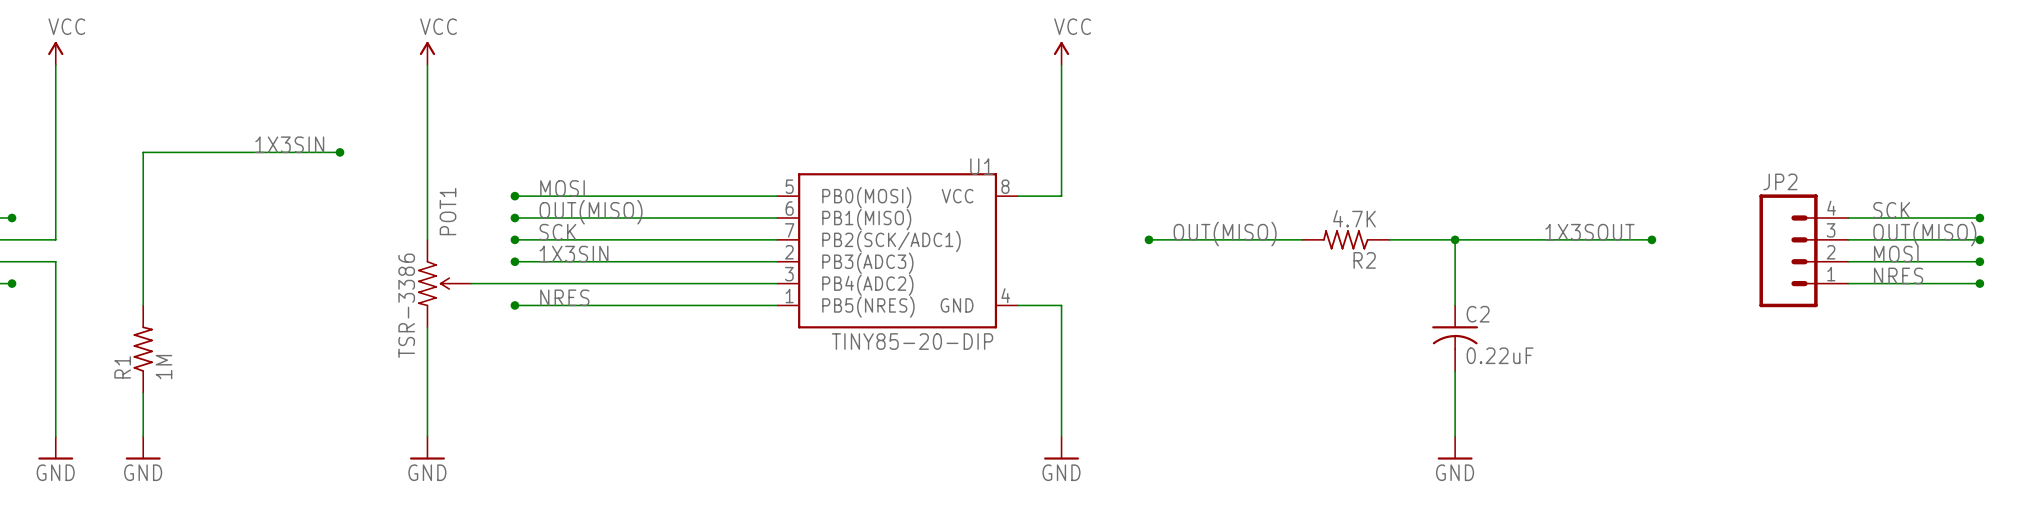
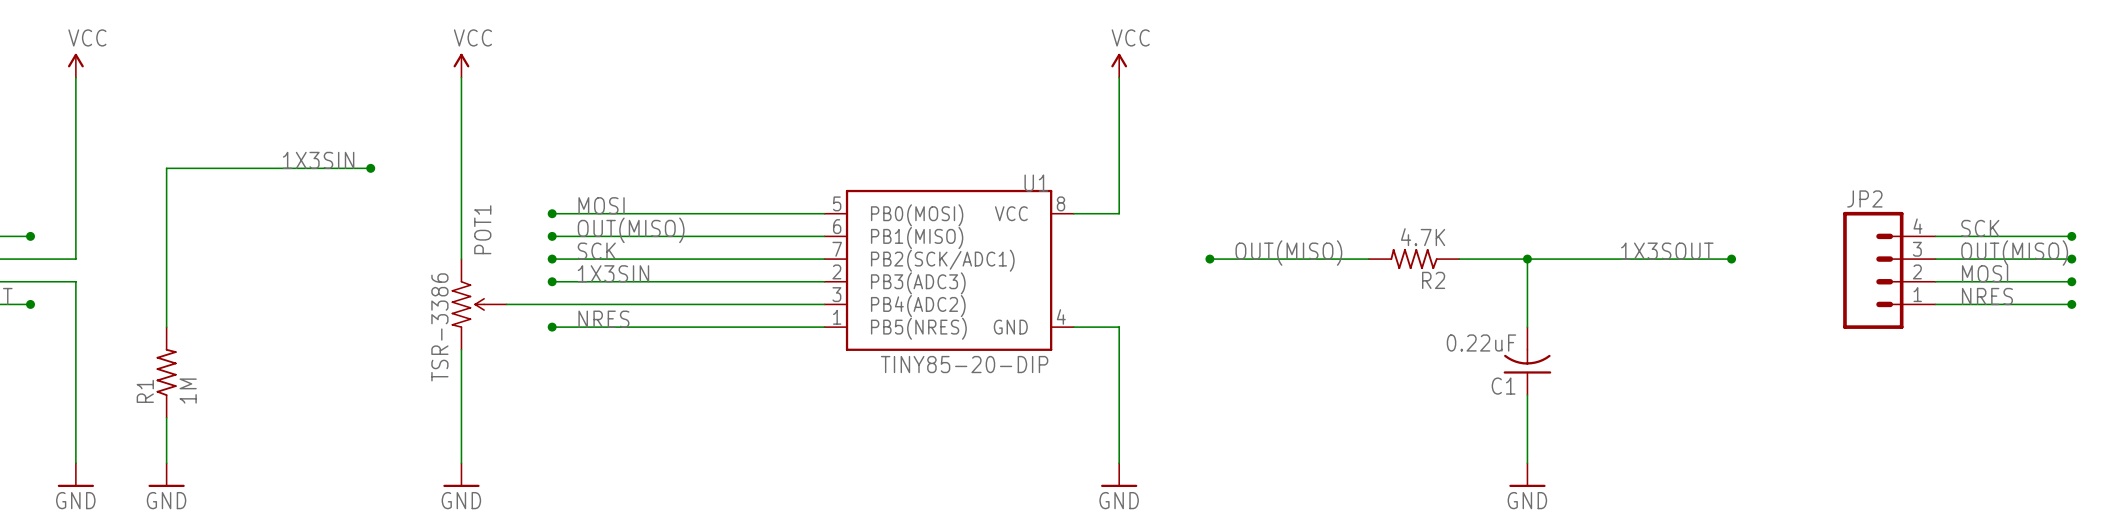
C2: 0.22uF (1455, 338) -> none
C1: none -> 0.22uF (1527, 361)

